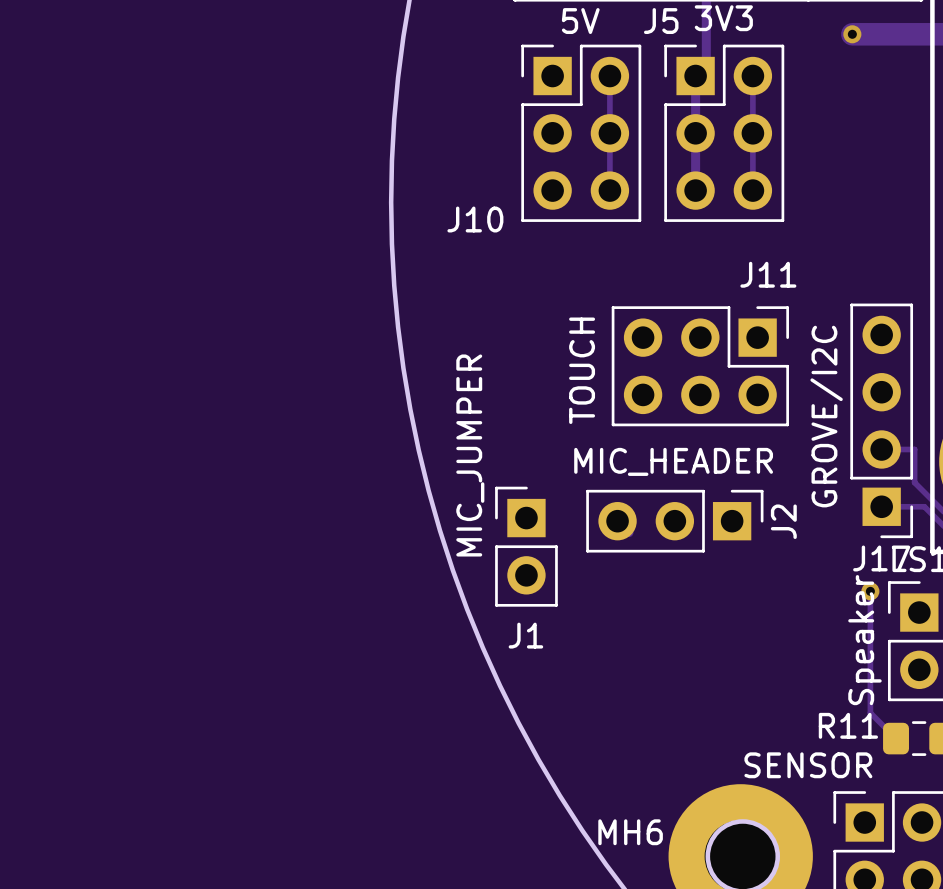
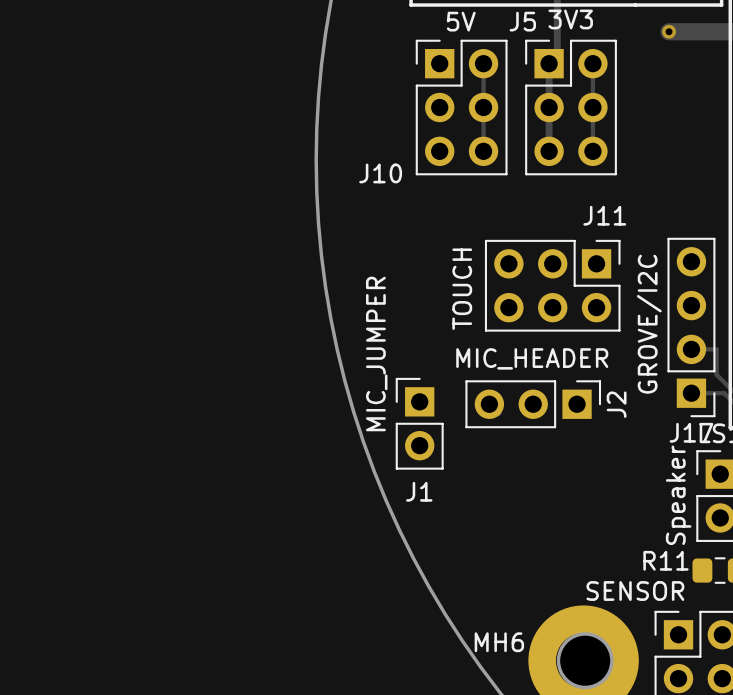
track: (870, 591) (870, 712) (896, 738) -> none
via: (870, 591) -> none

